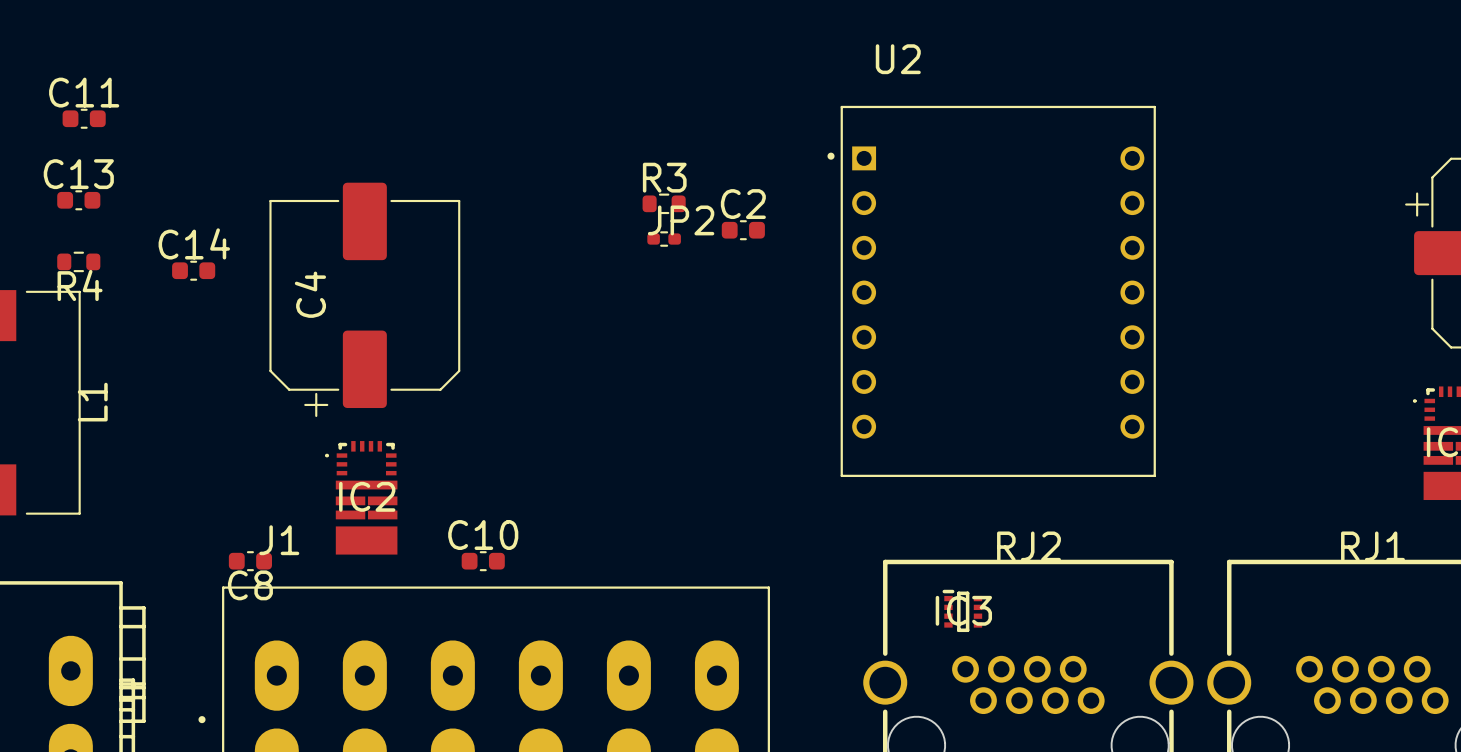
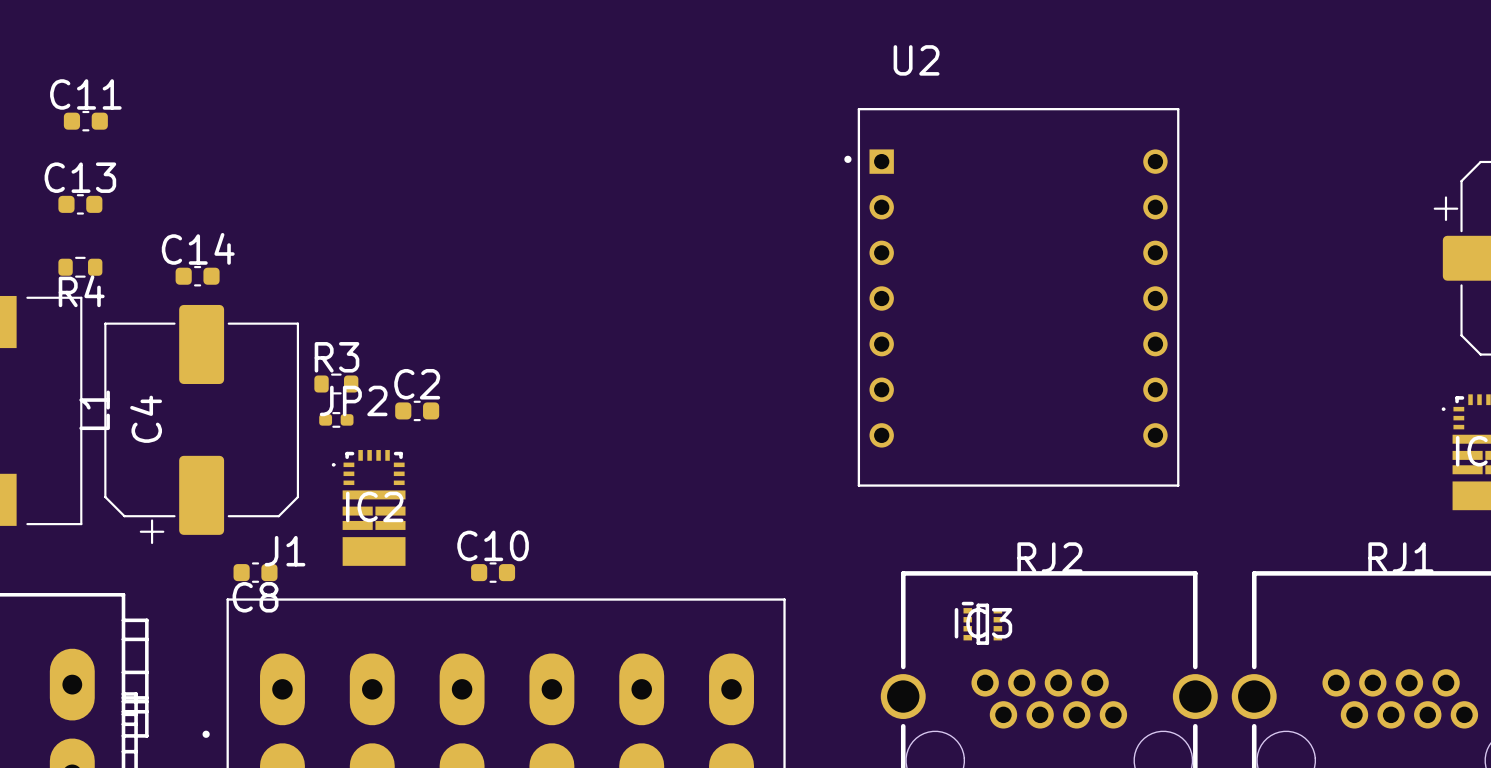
R3 position: (664, 203) -> (336, 383)
C2 position: (743, 230) -> (417, 410)
JP2 position: (664, 239) -> (336, 419)
C4 position: (364, 299) -> (201, 424)

